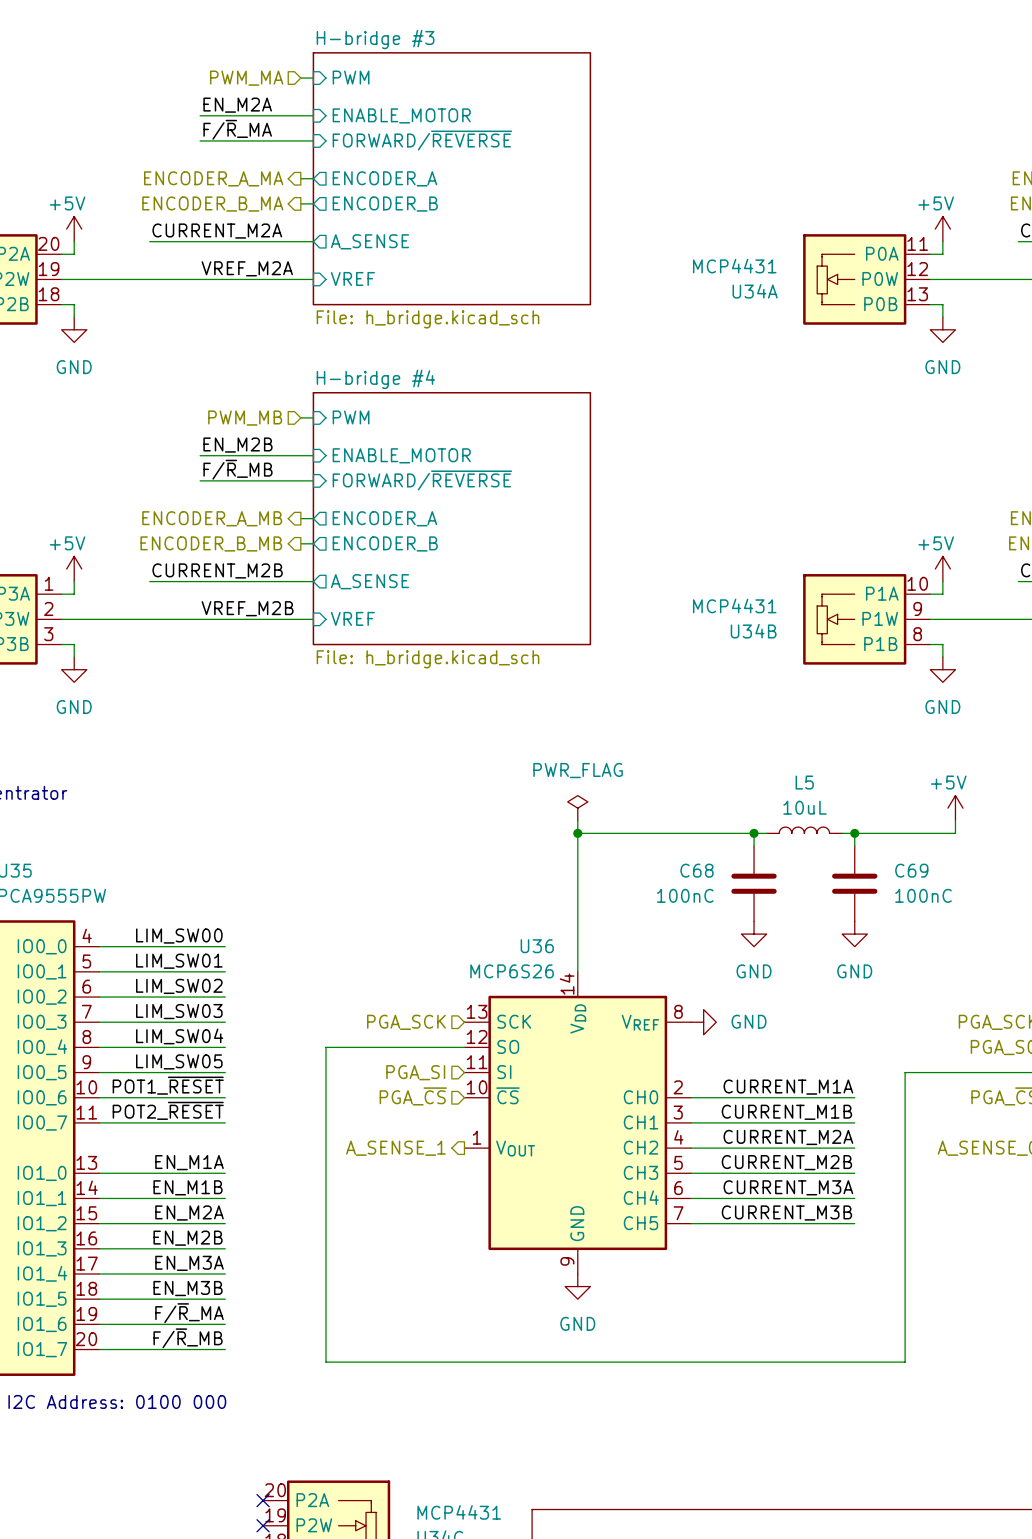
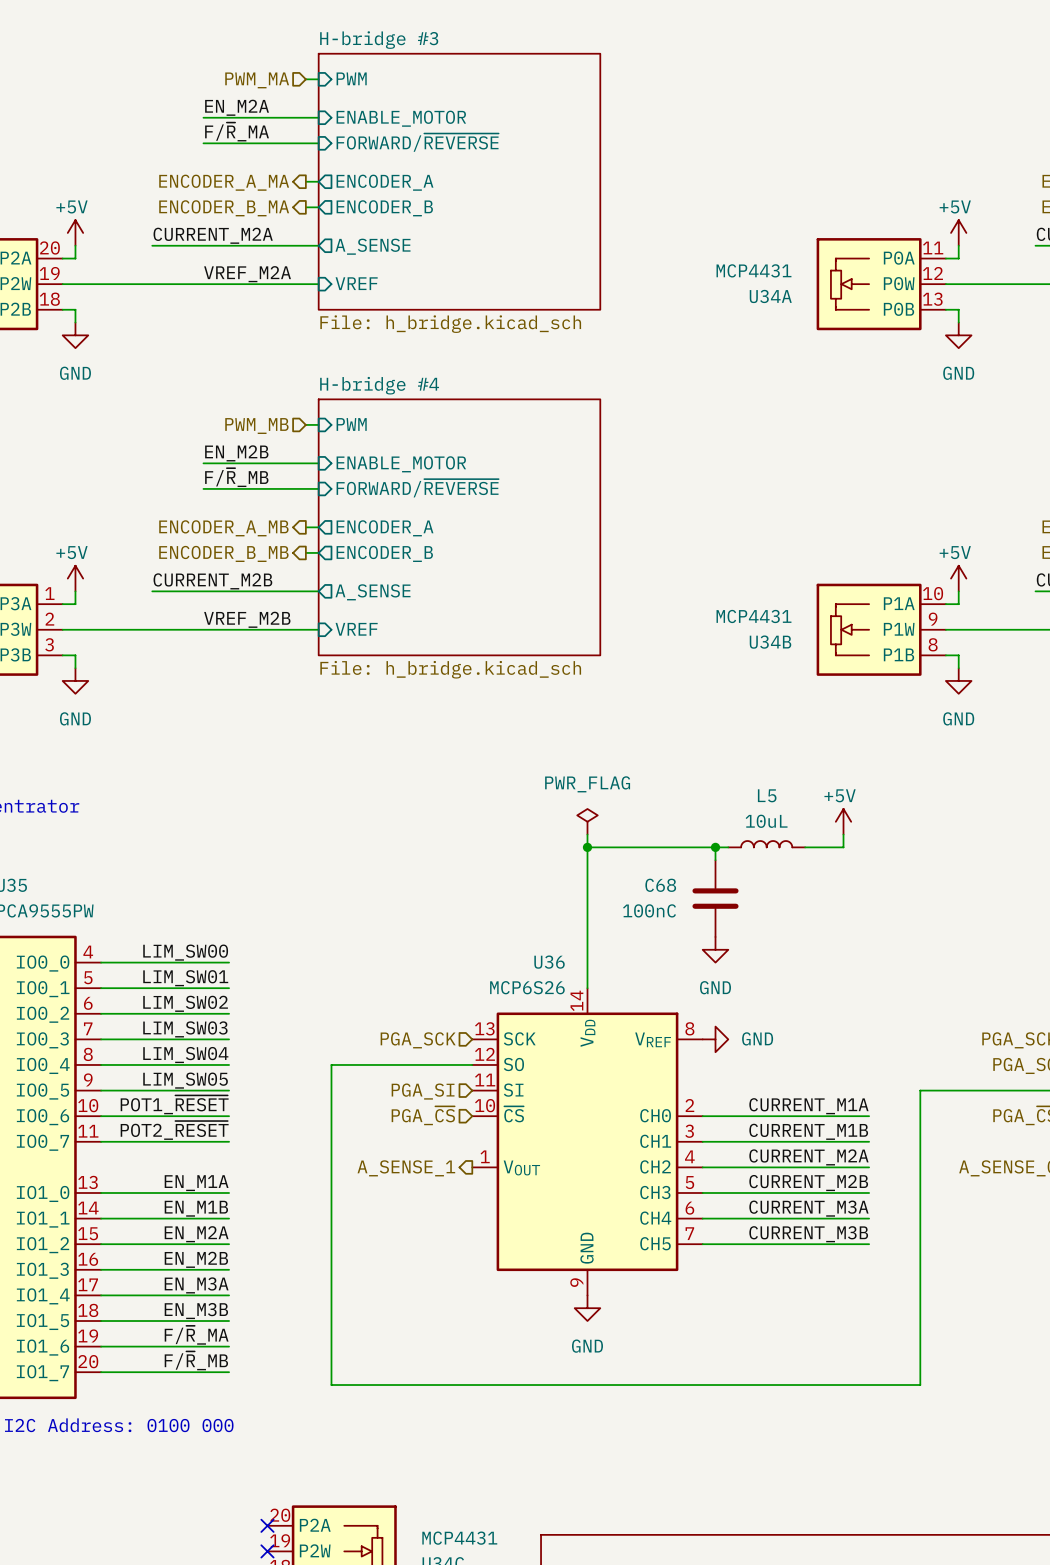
power symbol position: +5V (955, 808) -> +5V (843, 821)
wire: none -> (843, 834) (843, 847) (805, 847)
wire: (955, 820) (955, 833) (842, 833) -> none
L5 position: (804, 830) -> (766, 844)
wire: (716, 833) (766, 833) -> none
wire: (754, 833) (754, 845) -> (715, 847) (715, 860)
junction position: (754, 833) -> (715, 847)
wire: (854, 833) (854, 845) -> none
junction: (854, 833) -> none
C68 position: (754, 883) -> (715, 898)
C69: 100nC (854, 883) -> none
power symbol position: GND (754, 934) -> GND (715, 949)
power symbol: GND (854, 934) -> none

